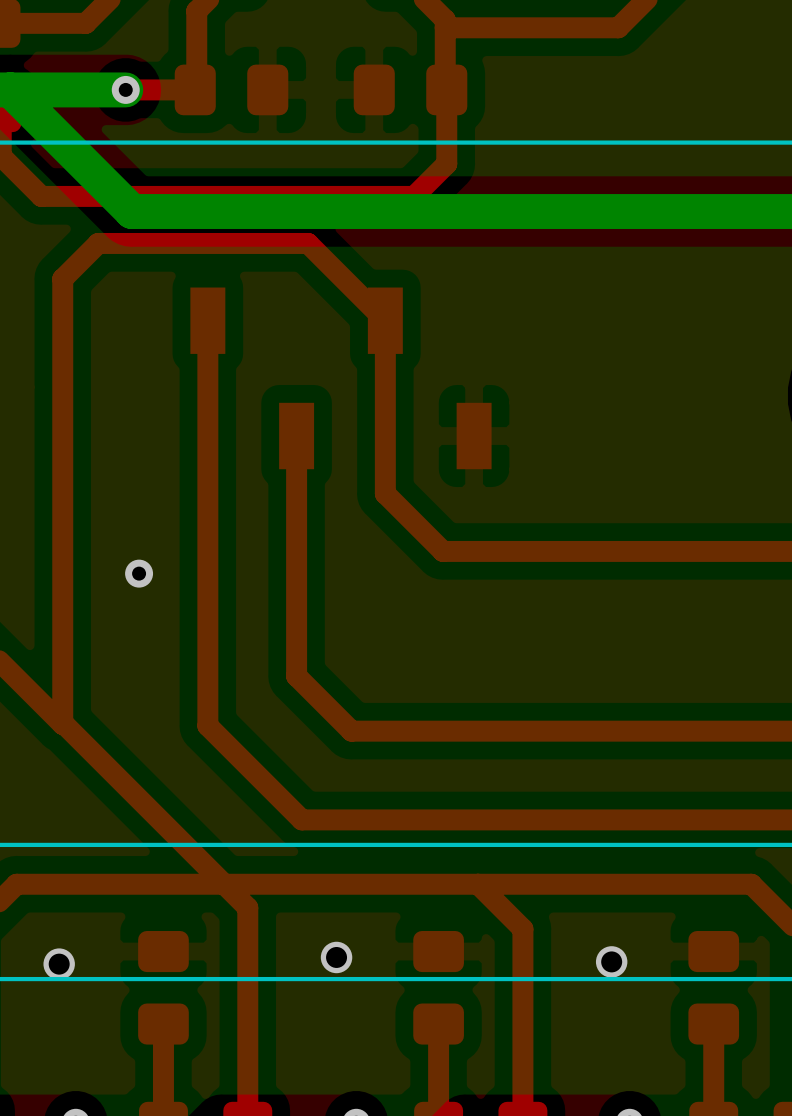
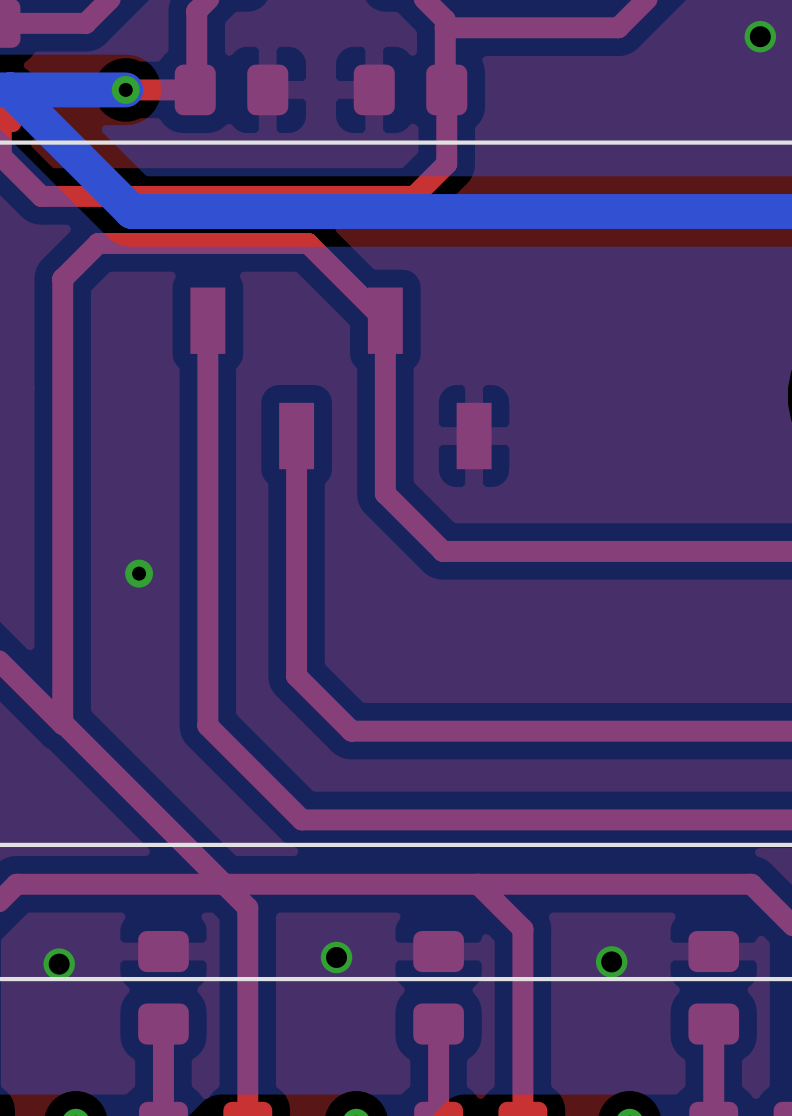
via: none -> (760, 36)

